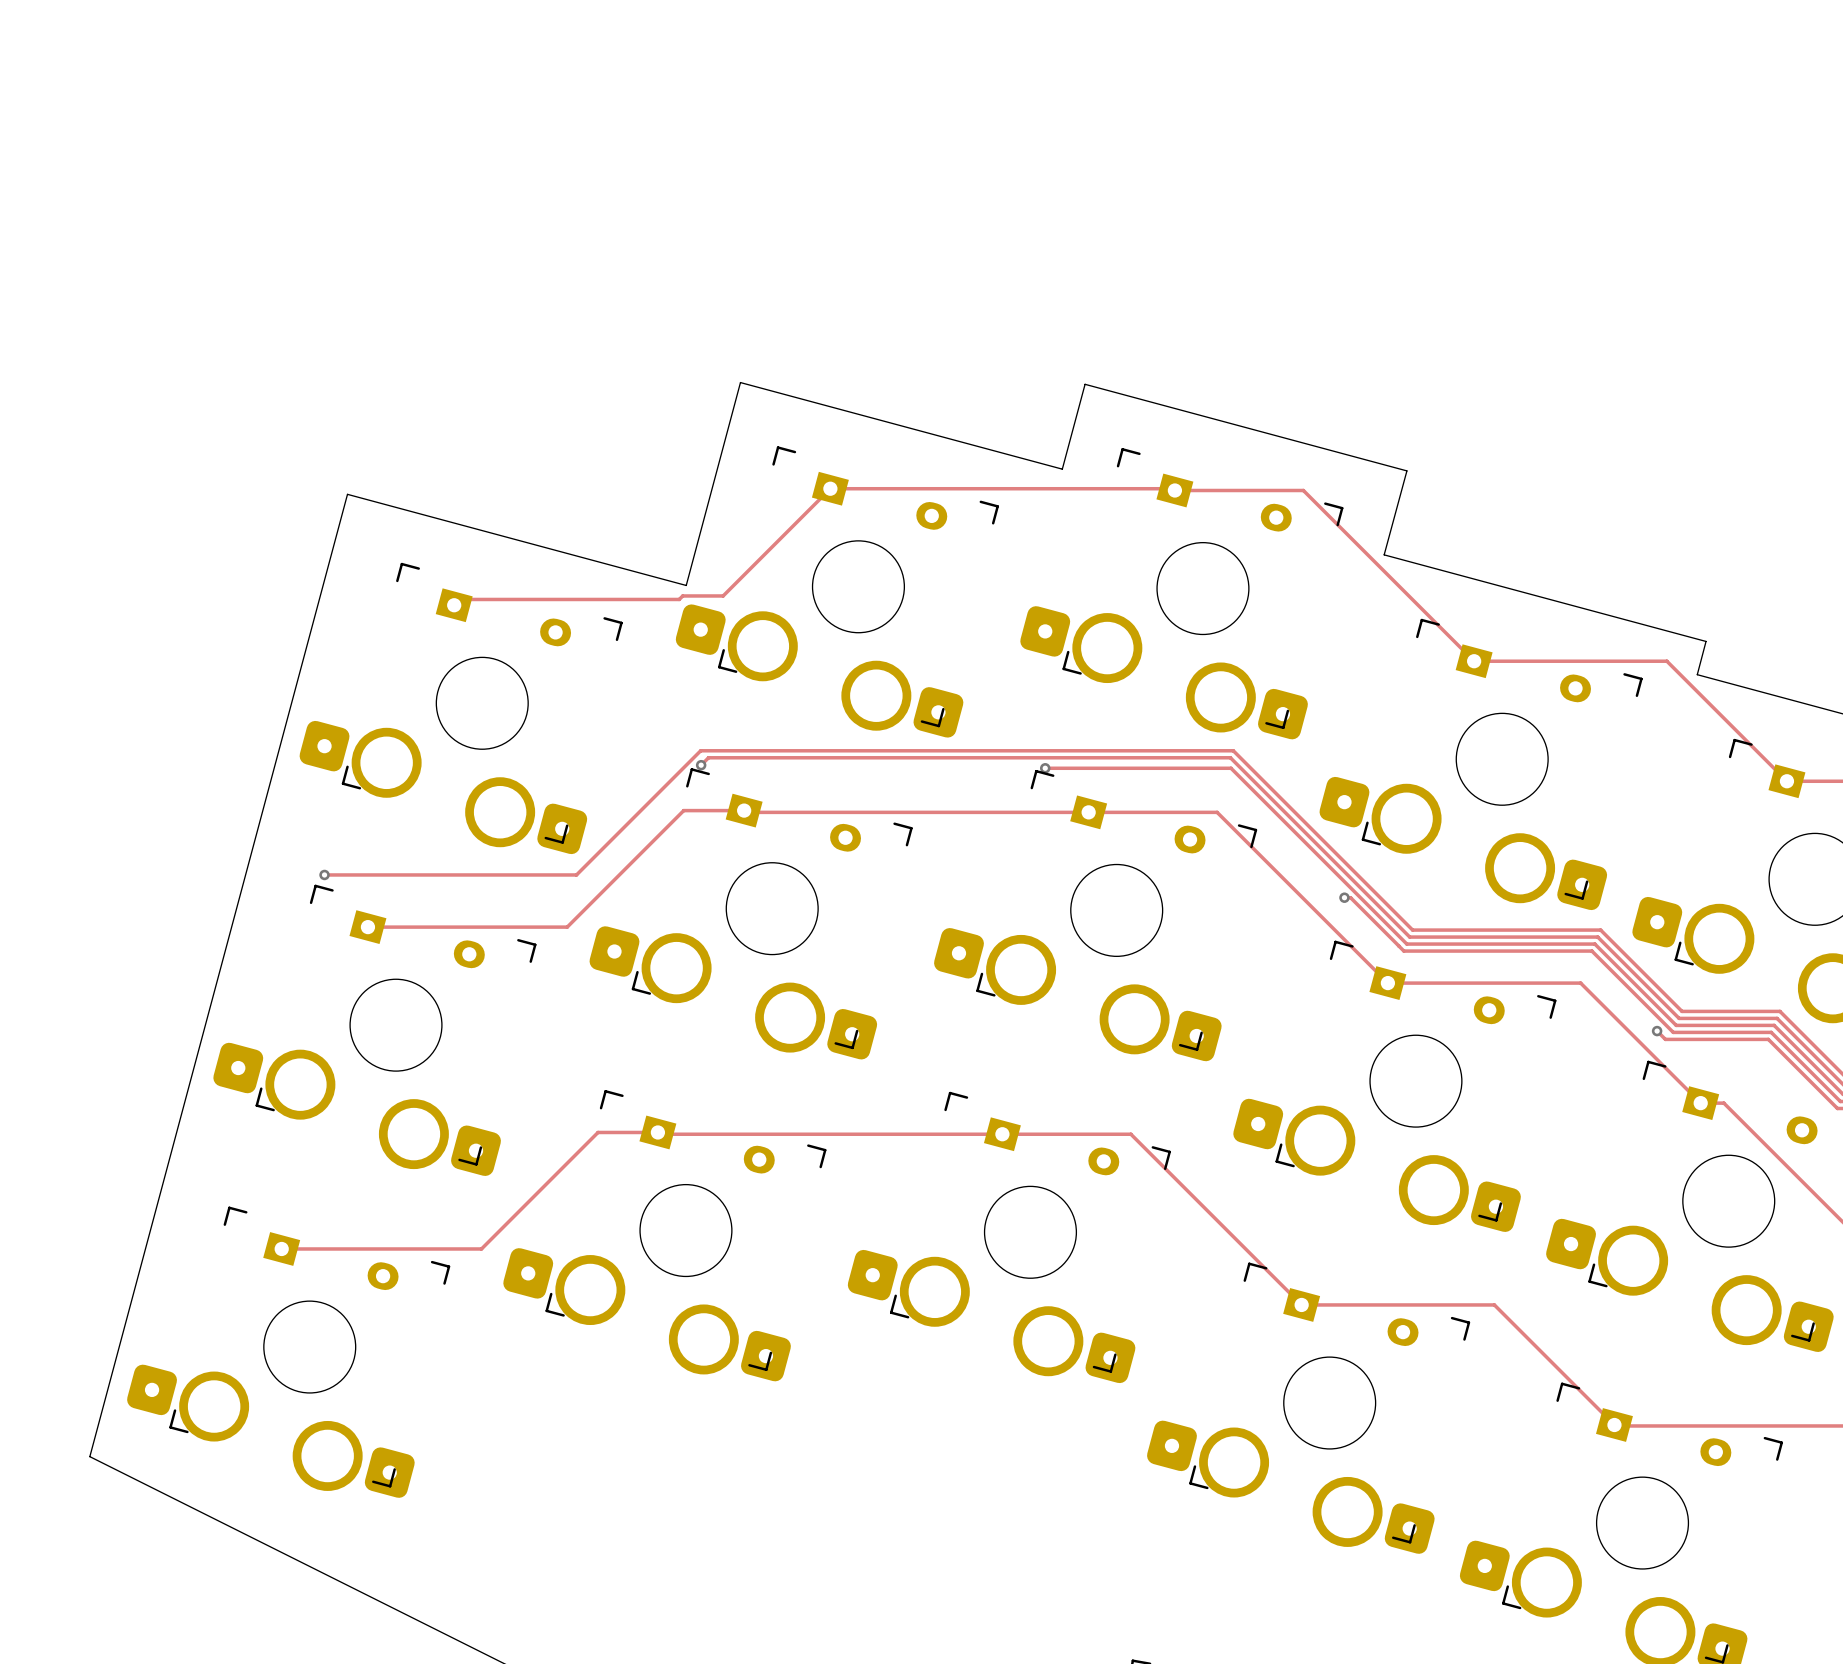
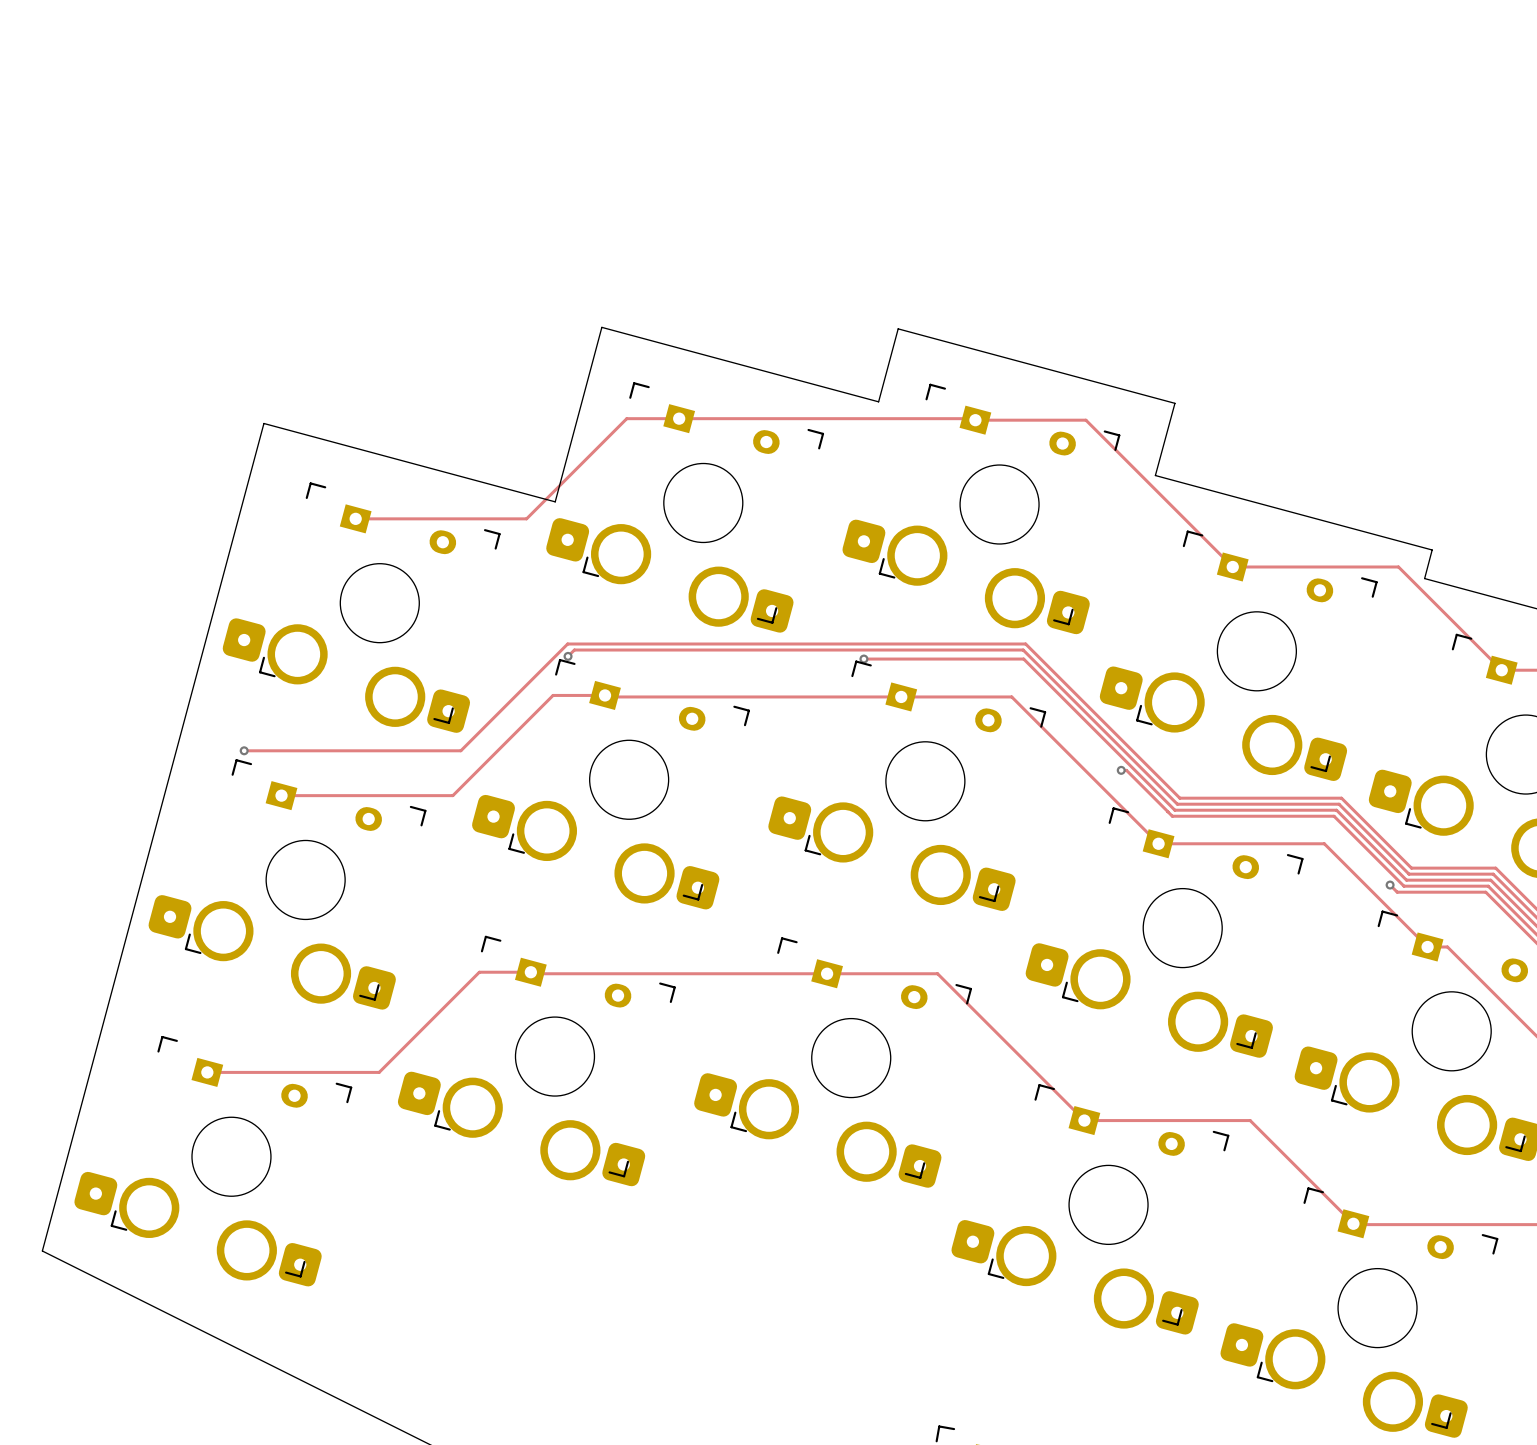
track: (830, 488) (723, 595) (682, 595) (679, 599) (459, 599) (454, 605) -> (679, 418) (626, 418) (526, 518) (355, 518)

